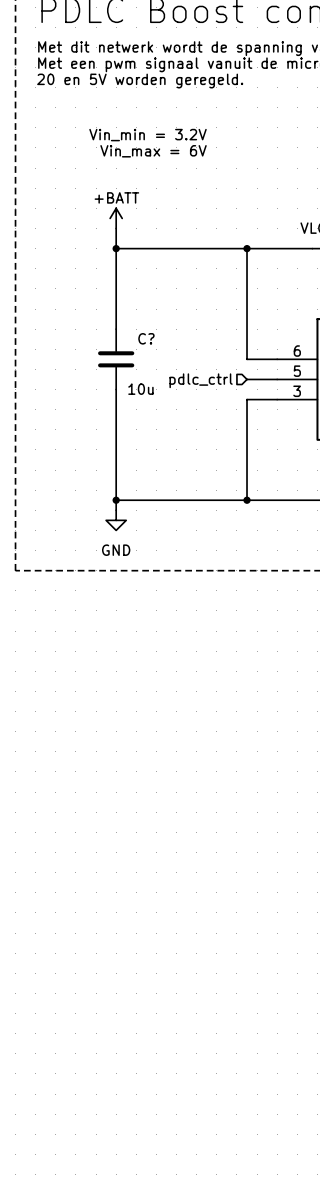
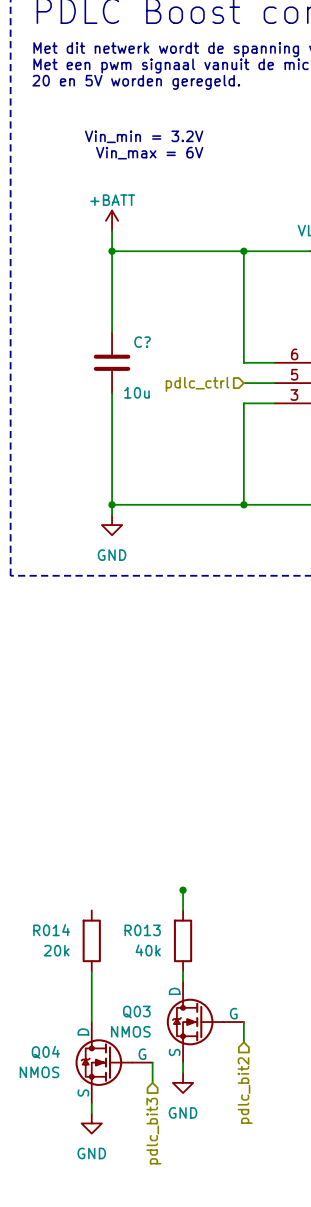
wire: none -> (183, 890) (183, 910)
junction: none -> (183, 890)
R014: none -> 20k (91, 940)
R013: none -> 40k (183, 940)
wire: none -> (91, 971) (91, 1022)
wire: none -> (183, 971) (183, 981)
Q03: none -> NMOS (205, 1022)
wire: none -> (243, 1022) (243, 1042)
Q04: none -> NMOS (114, 1062)
wire: none -> (152, 1062) (152, 1082)
wire: none -> (183, 1062) (183, 1072)
power symbol: none -> GND (183, 1082)
hierarchical label: none -> pdlc_bit2 (245, 1090)
wire: none -> (91, 1103) (91, 1113)
power symbol: none -> GND (91, 1123)
hierarchical label: none -> pdlc_bit3 (153, 1131)

